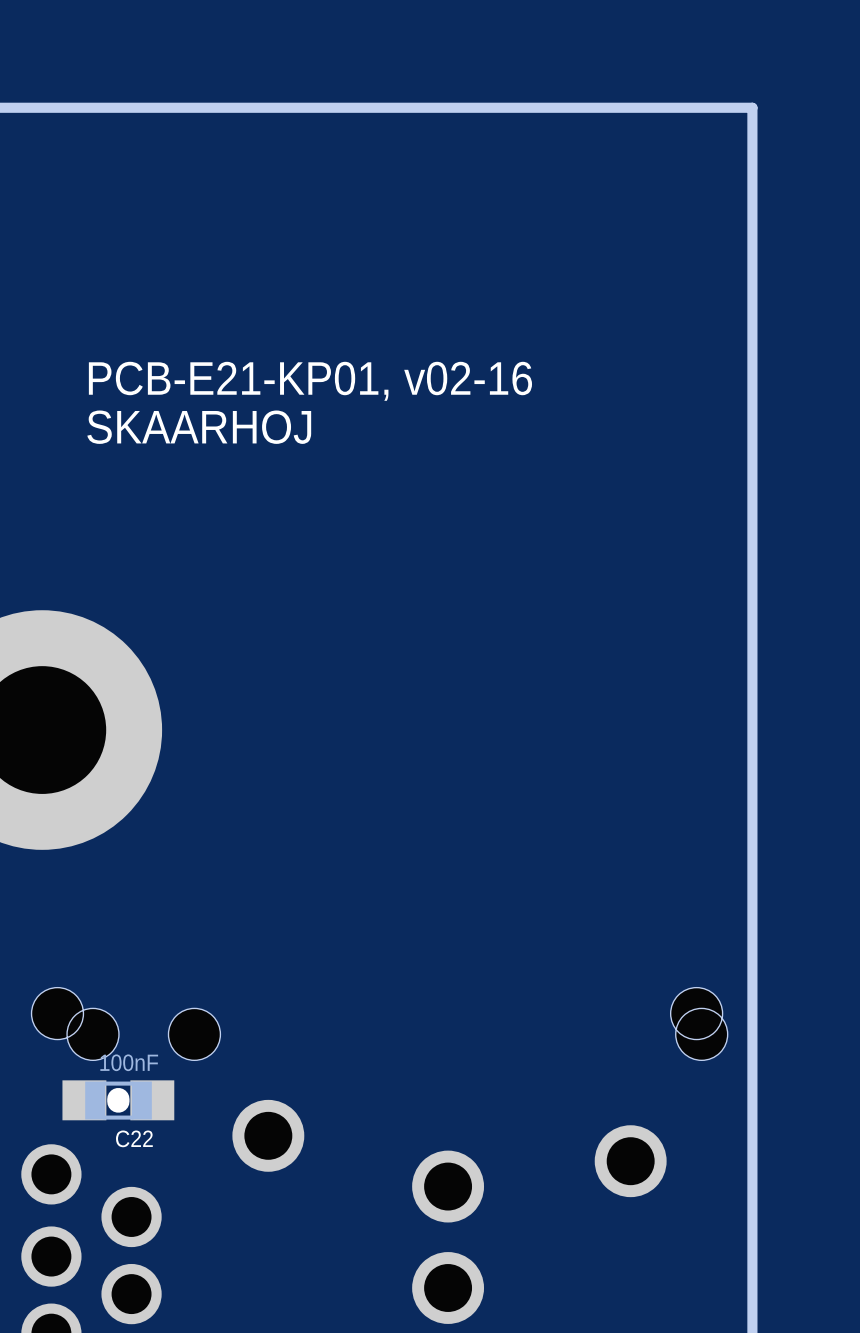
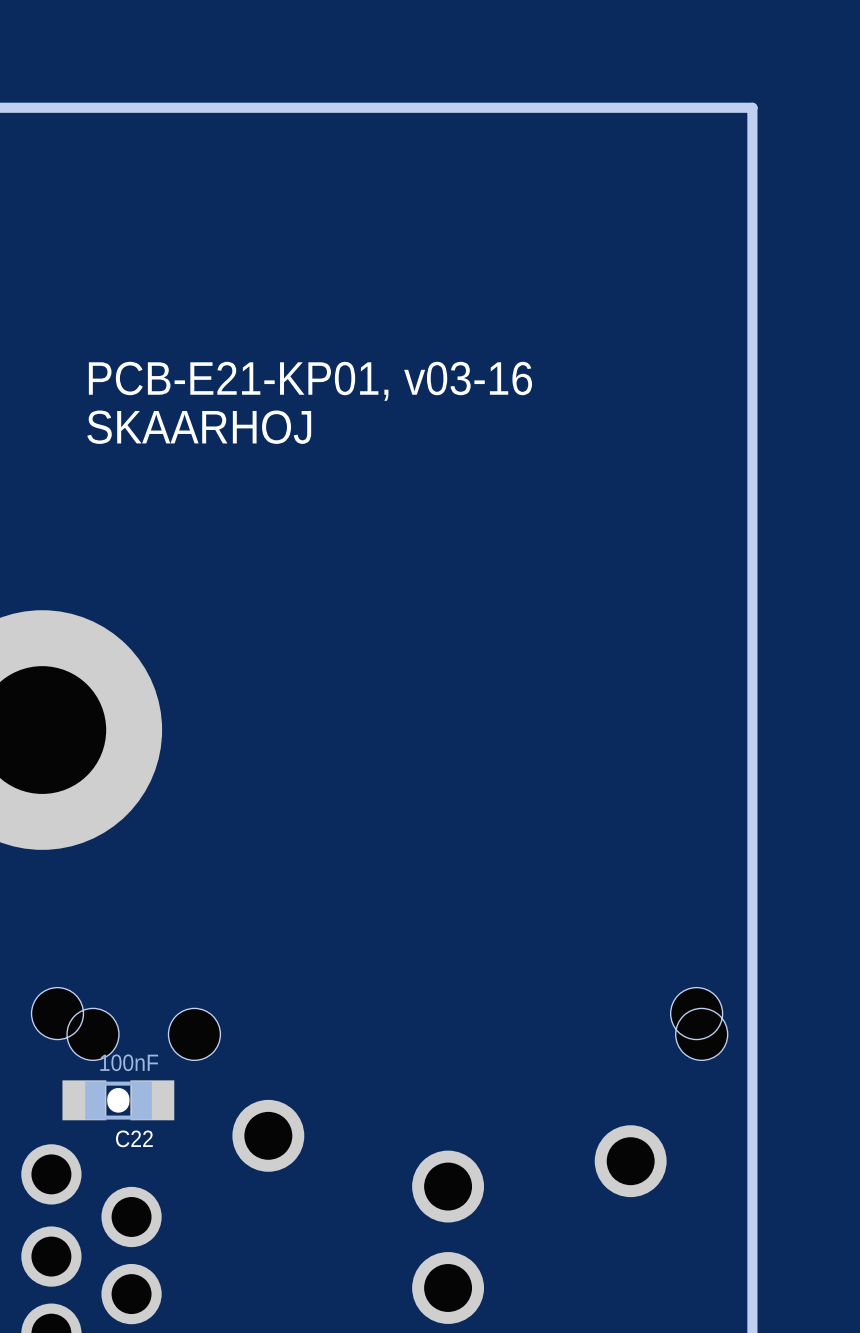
text: PCB-E21-KP01, v02-16 (310, 381) -> PCB-E21-KP01, v03-16 (310, 381)

